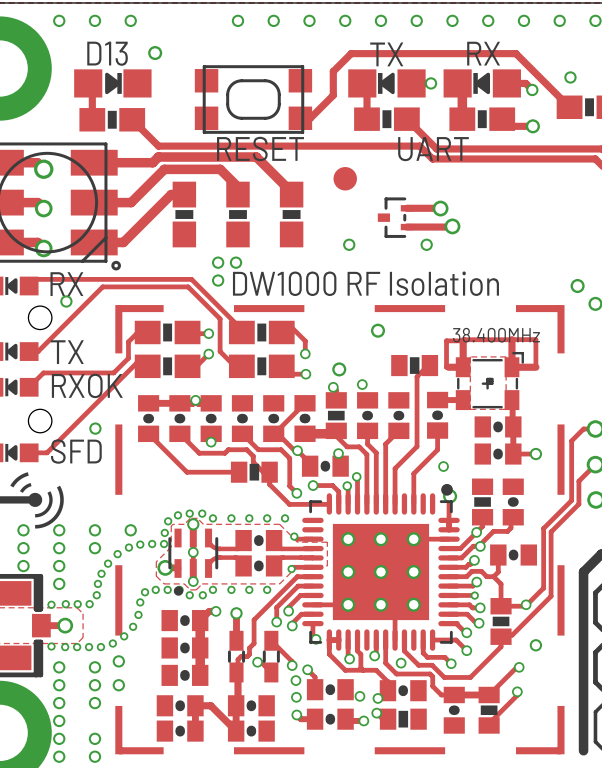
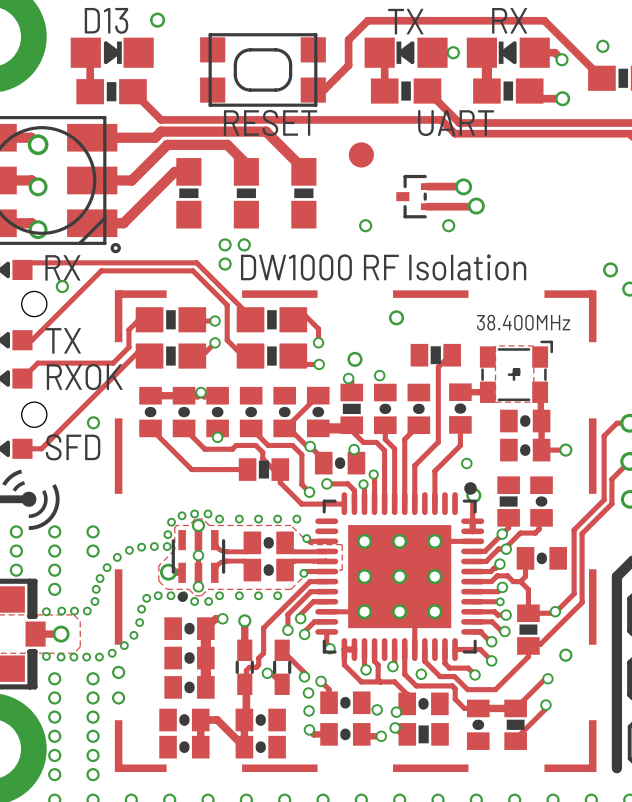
track: (512, 339) (535, 339) (535, 367) (511, 367) (511, 339) (463, 340) -> none
track: (463, 340) (463, 367) (446, 367) (446, 340) (463, 340) -> none
via: (130, 530) -> none
via: none -> (93, 736)

